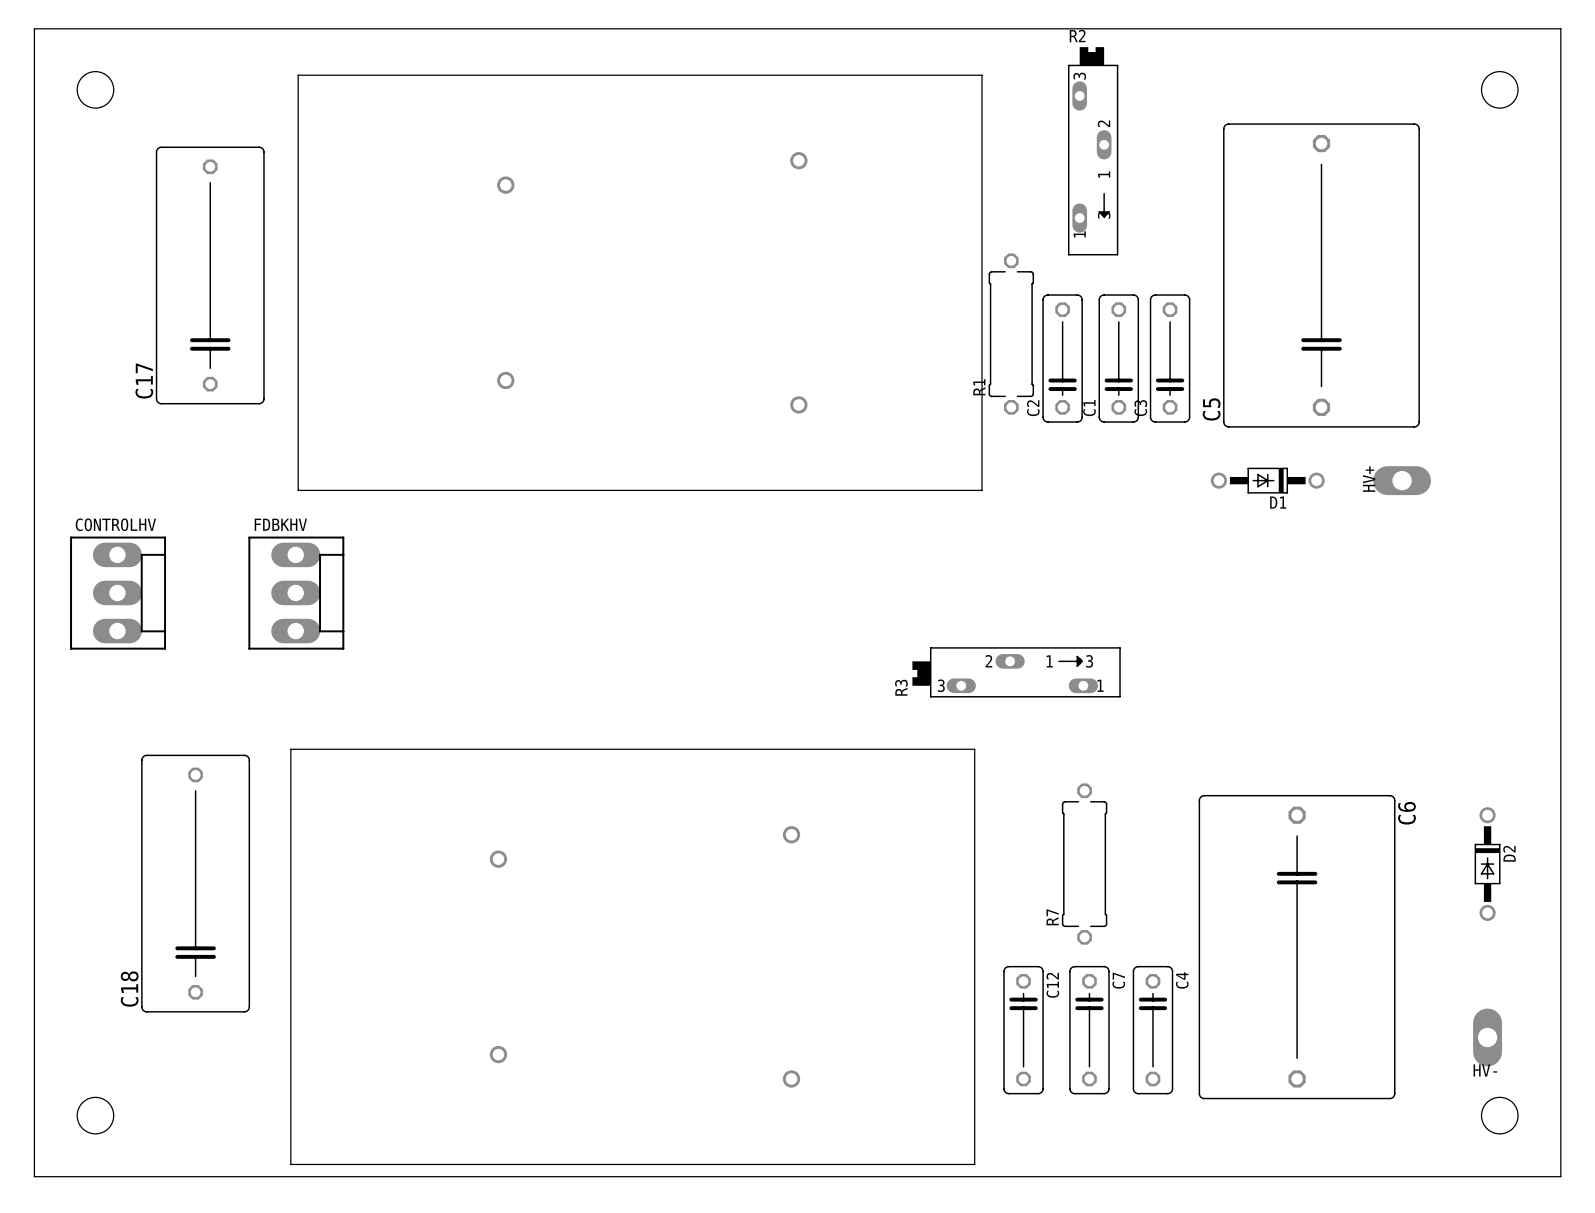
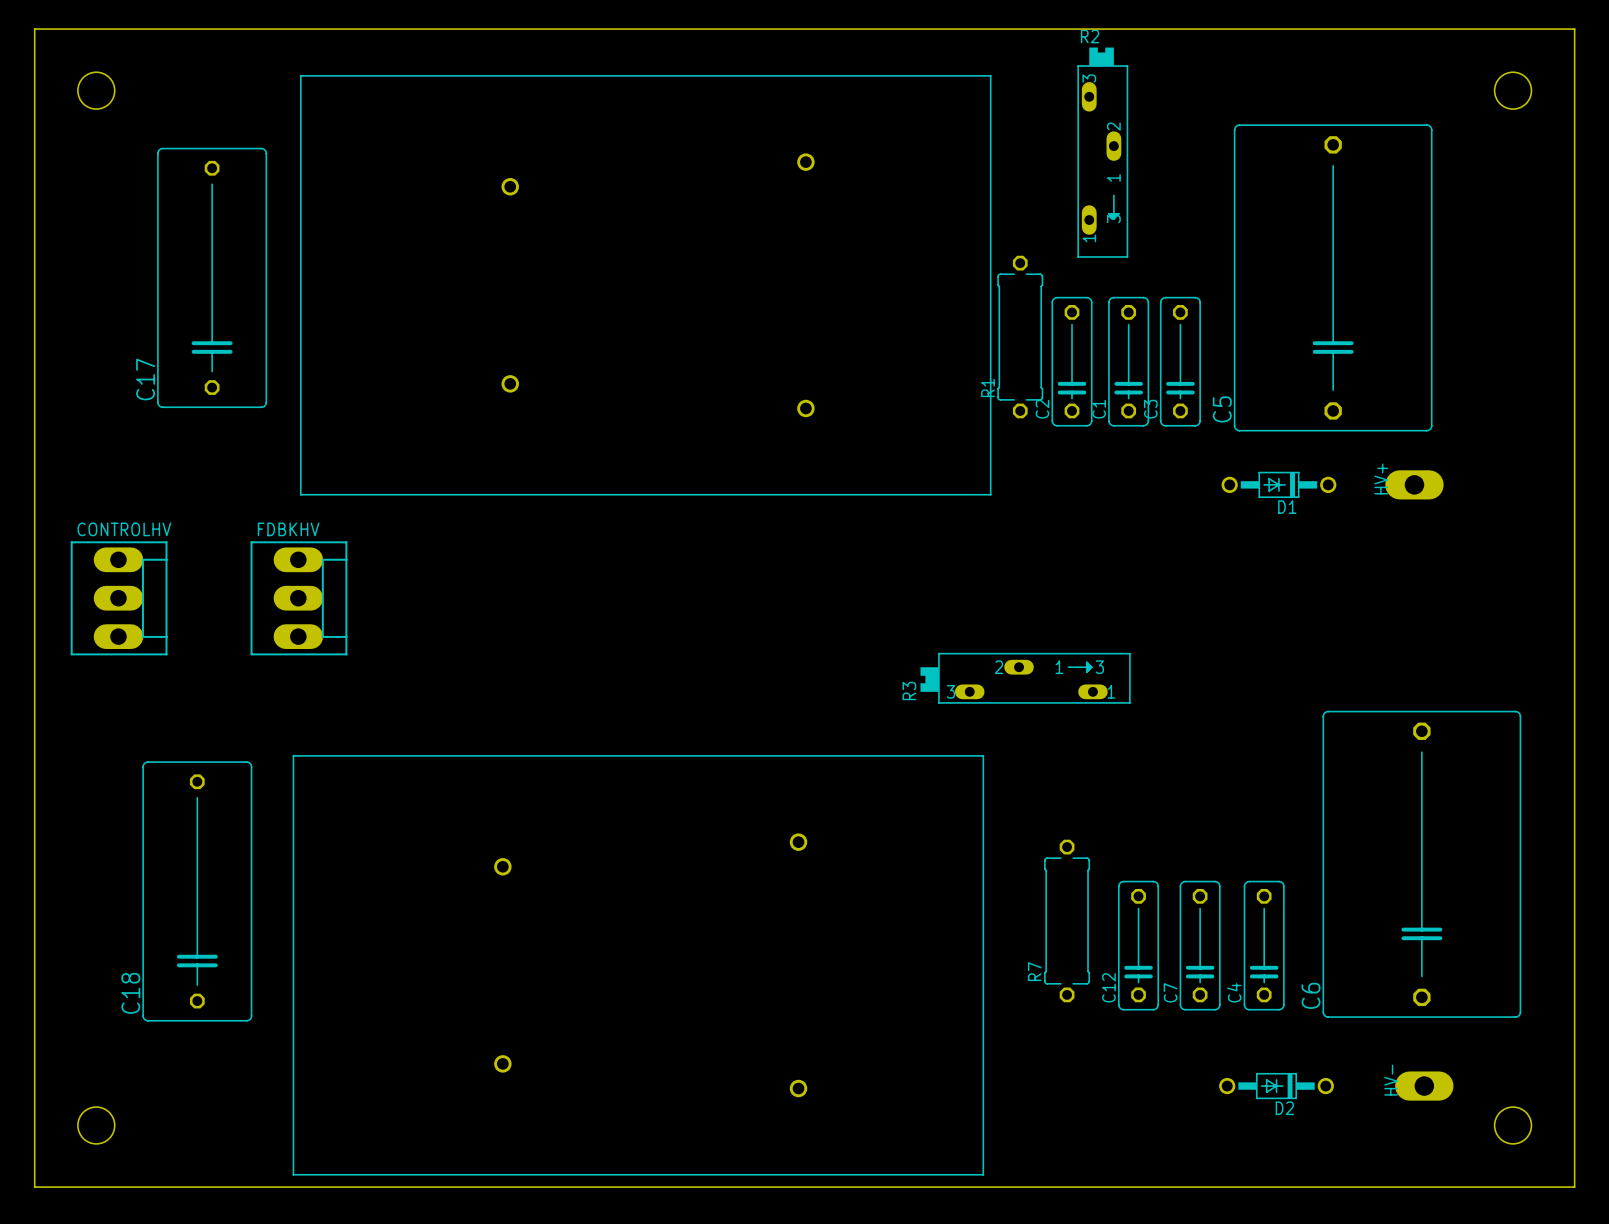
R7 position: (1084, 864) -> (1067, 920)
D2 rotation: 0° (1487, 864) -> 90° clockwise (1276, 1086)
D2 position: (1487, 864) -> (1276, 1086)
C6 rotation: 0° (1297, 947) -> 180° (1421, 864)
C12 rotation: 0° (1023, 1030) -> 180° (1138, 945)
C12 position: (1023, 1030) -> (1138, 945)
C7 rotation: 0° (1089, 1030) -> 180° (1200, 945)
C7 position: (1089, 1030) -> (1200, 945)
C4 rotation: 0° (1152, 1030) -> 180° (1264, 945)
C4 position: (1152, 1030) -> (1264, 945)
HV- rotation: 0° (1487, 1037) -> 90° clockwise (1424, 1086)
HV- position: (1487, 1037) -> (1424, 1086)

